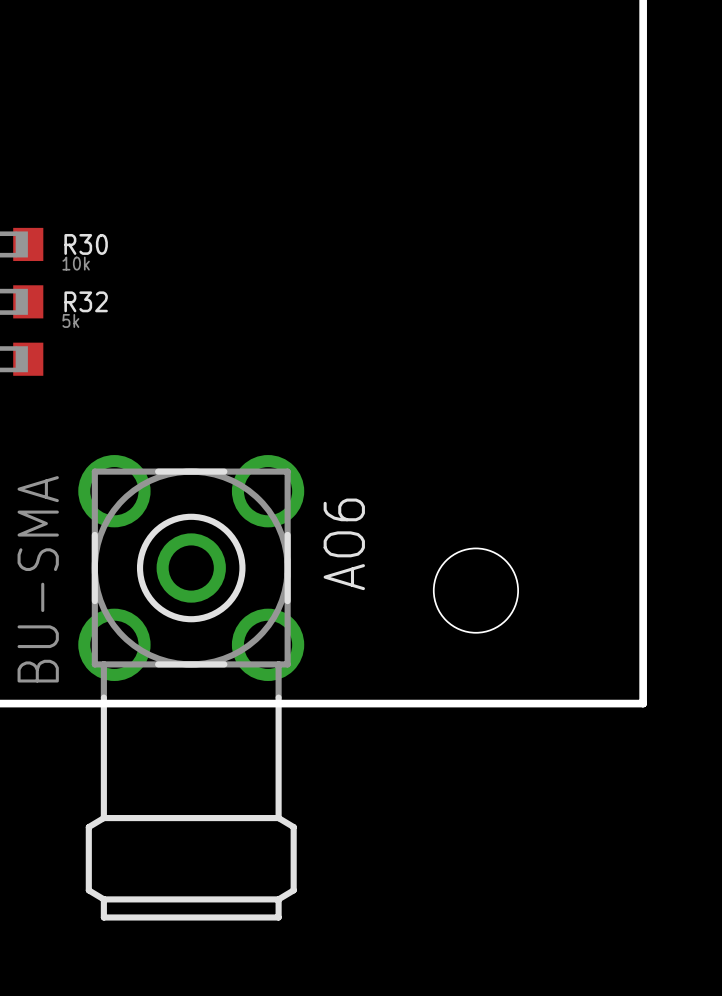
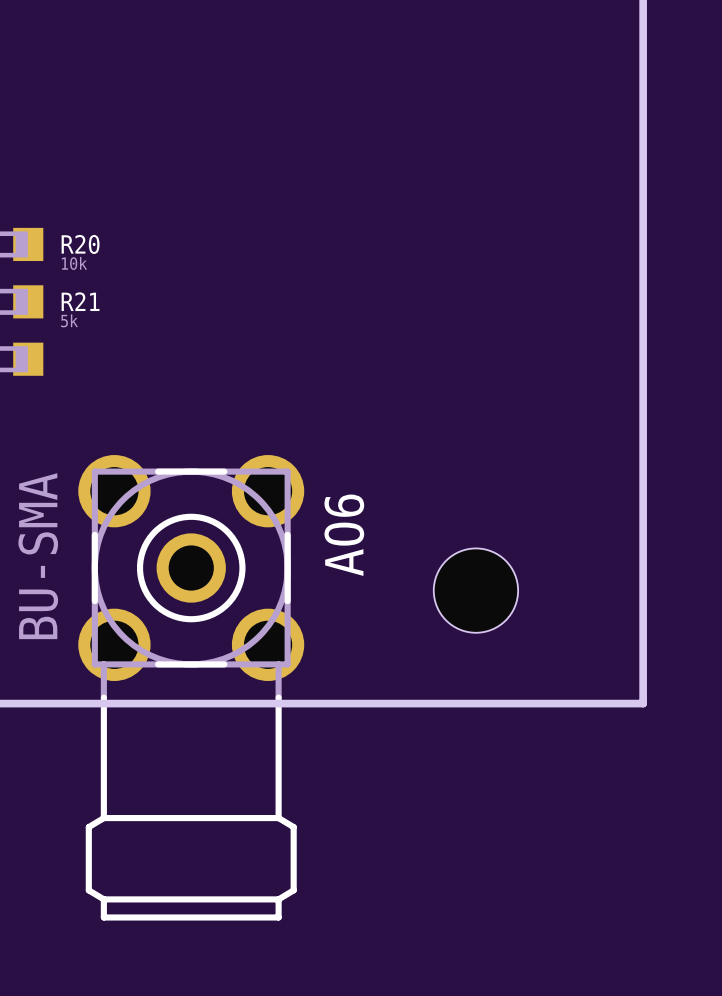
R30 name: R30 (86, 244) -> R20 (80, 244)
R32 name: R32 (86, 301) -> R21 (80, 301)

